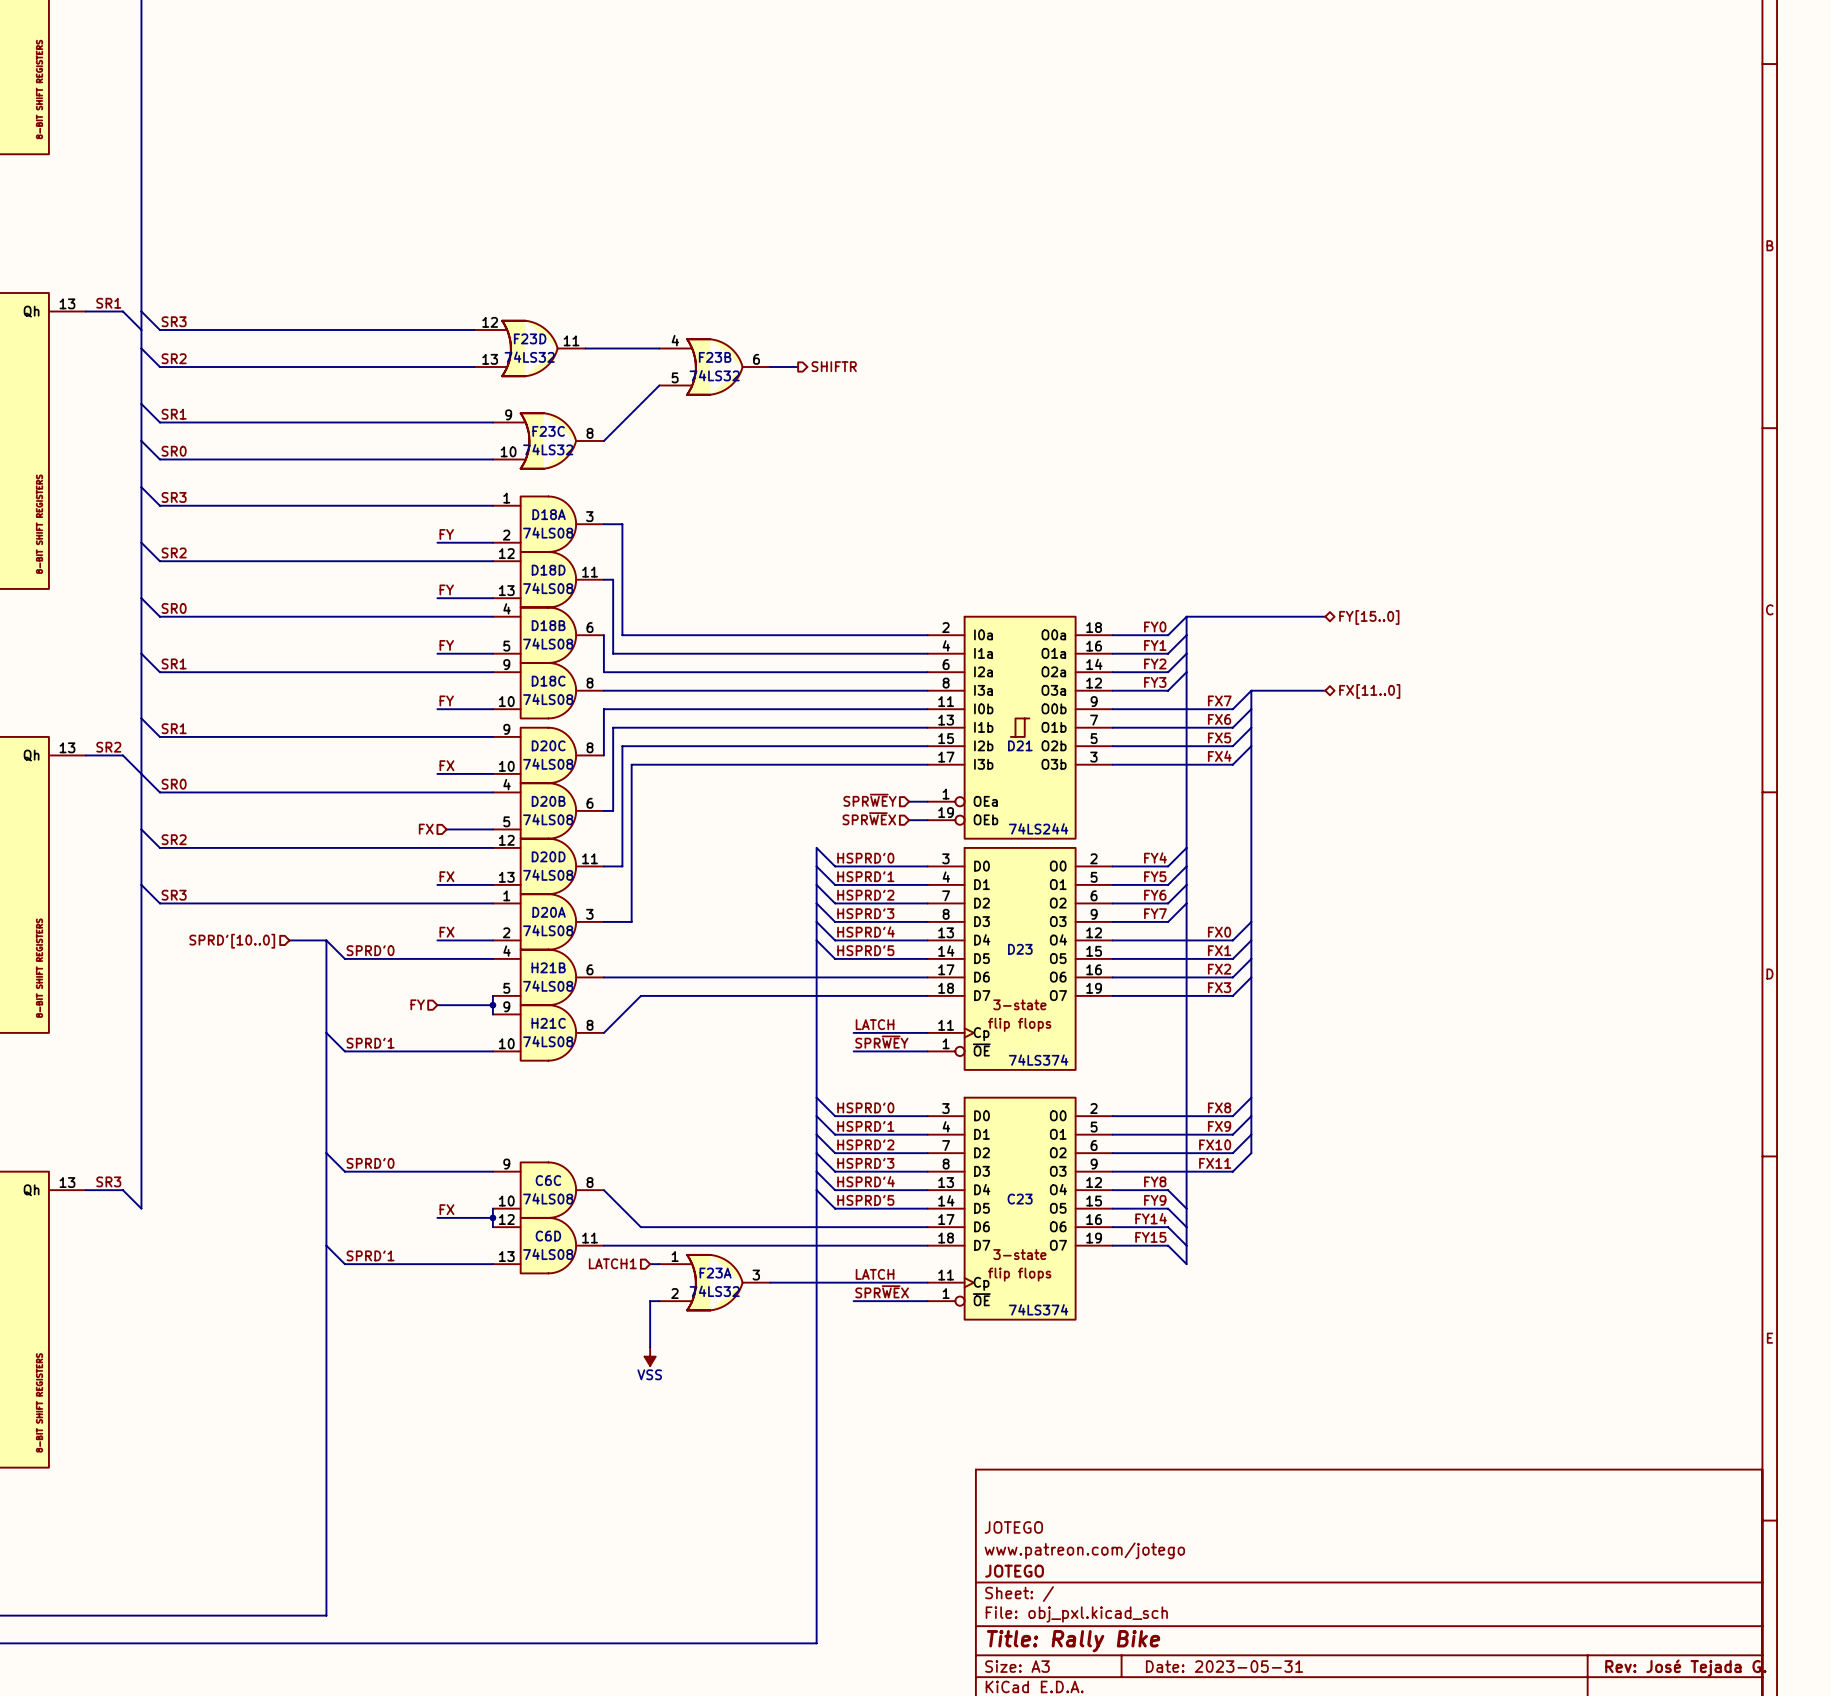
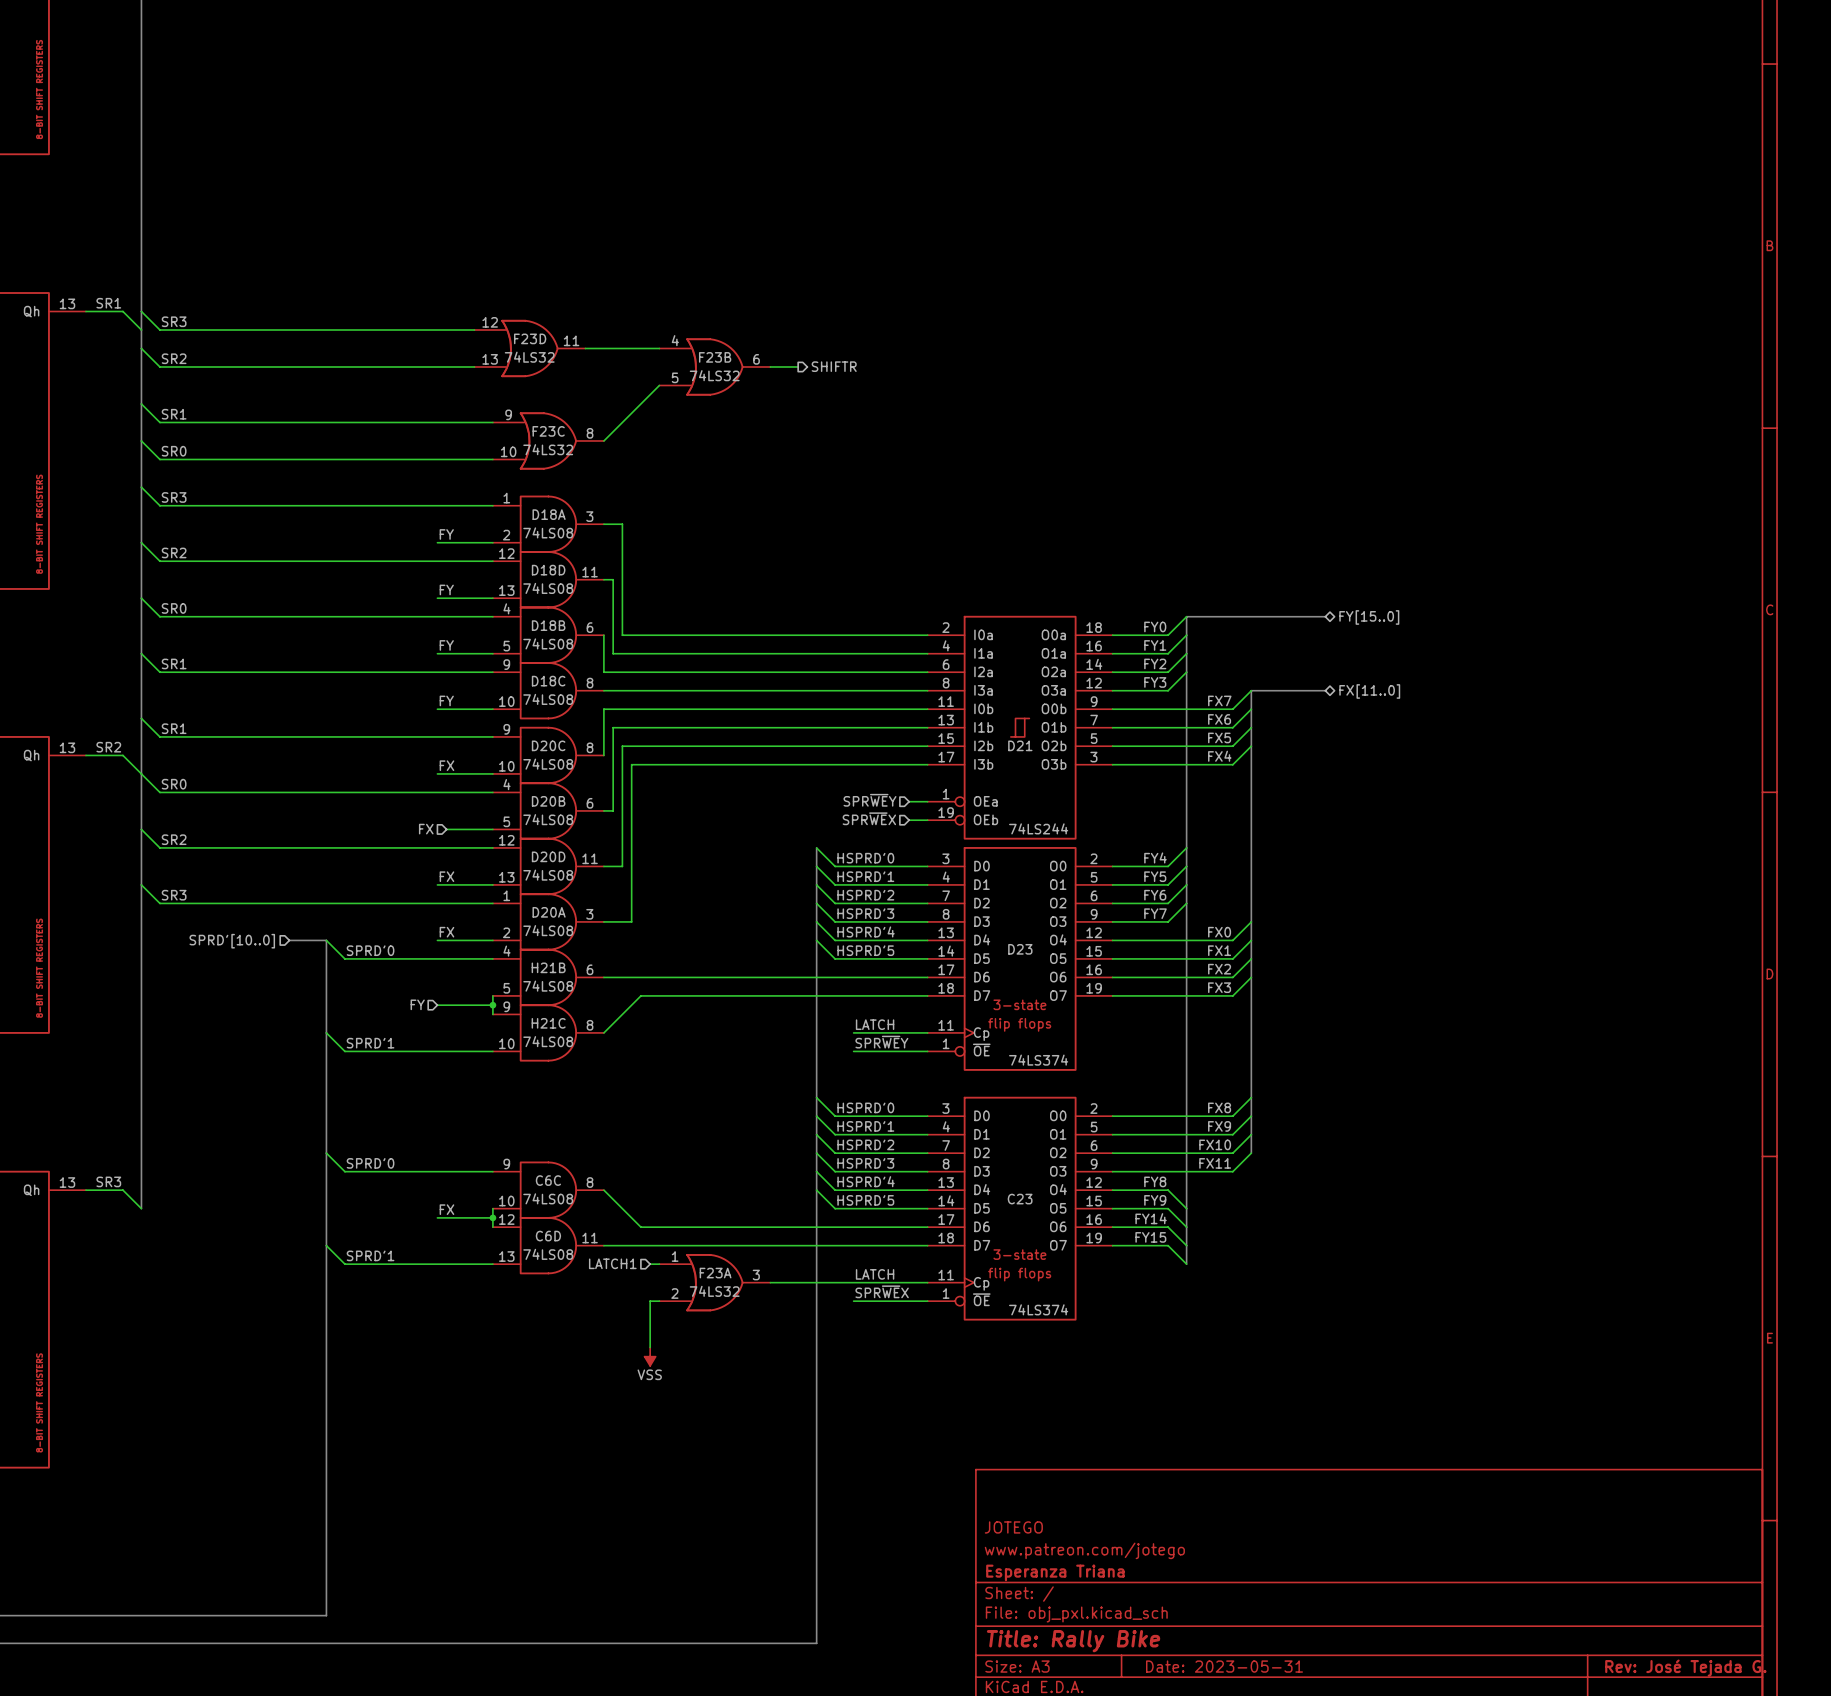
title block: JOTEGO (1014, 1571) -> Esperanza Triana (1055, 1572)

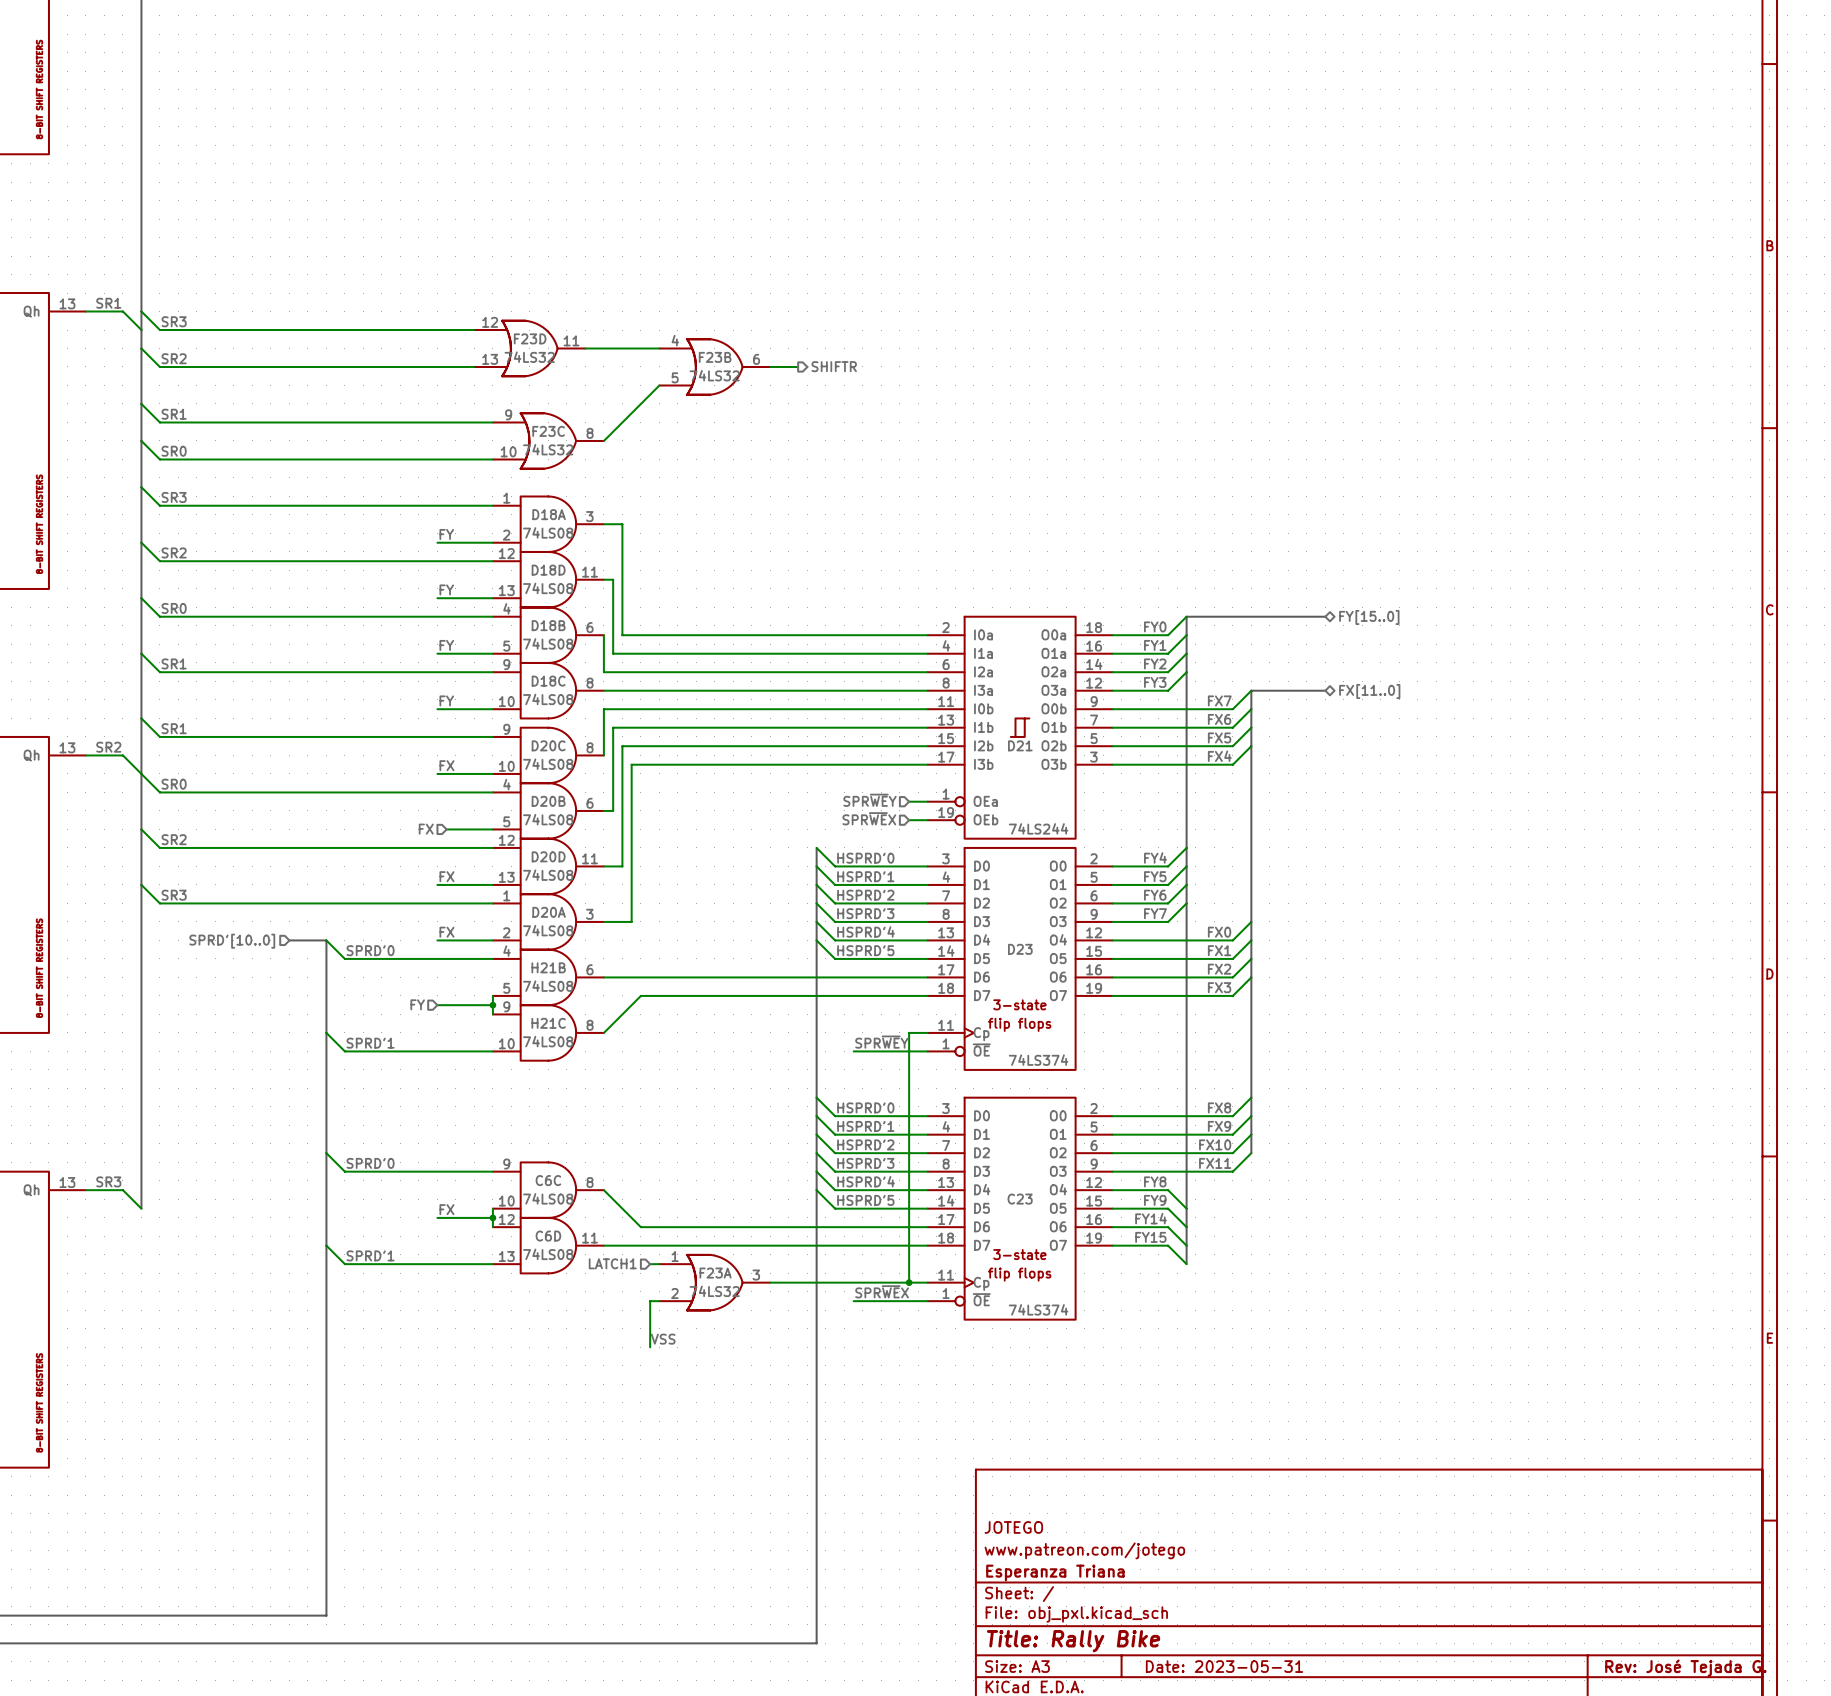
label: LATCH (875, 1024) -> none
wire: (853, 1032) (909, 1032) -> (909, 1282) (909, 1032)
label: LATCH (875, 1274) -> none
junction: none -> (909, 1282)
label: none -> VSS (663, 1339)
power symbol: VSS (650, 1356) -> none

